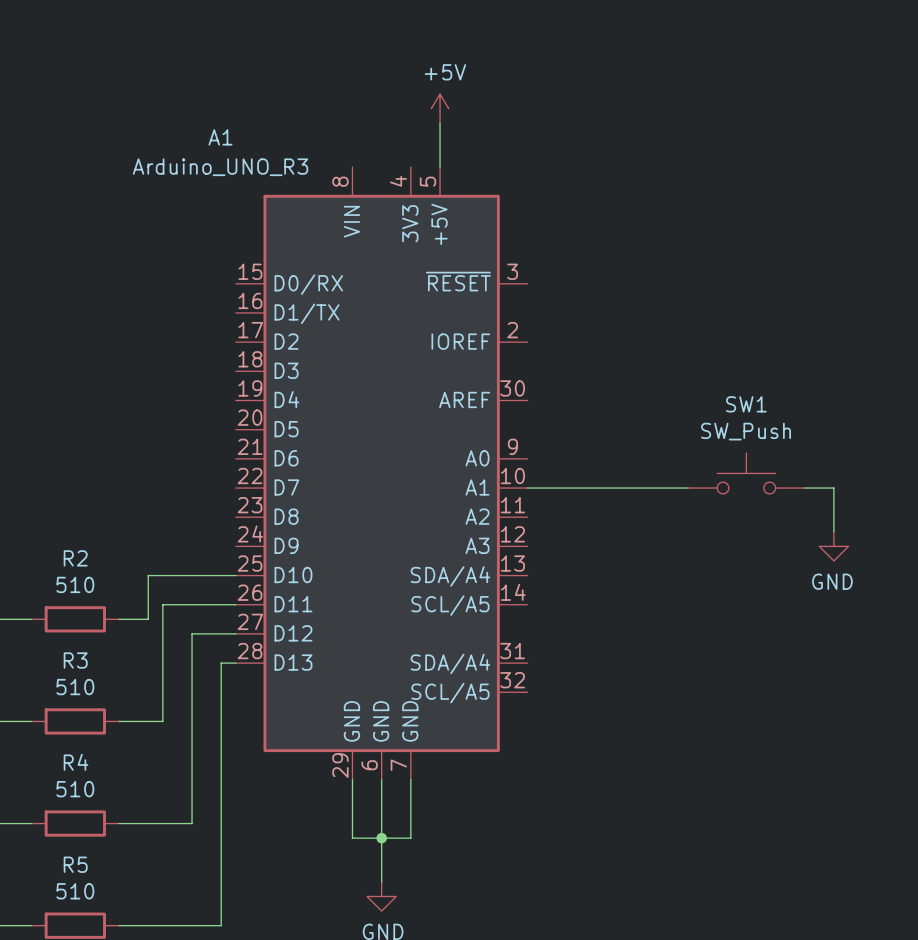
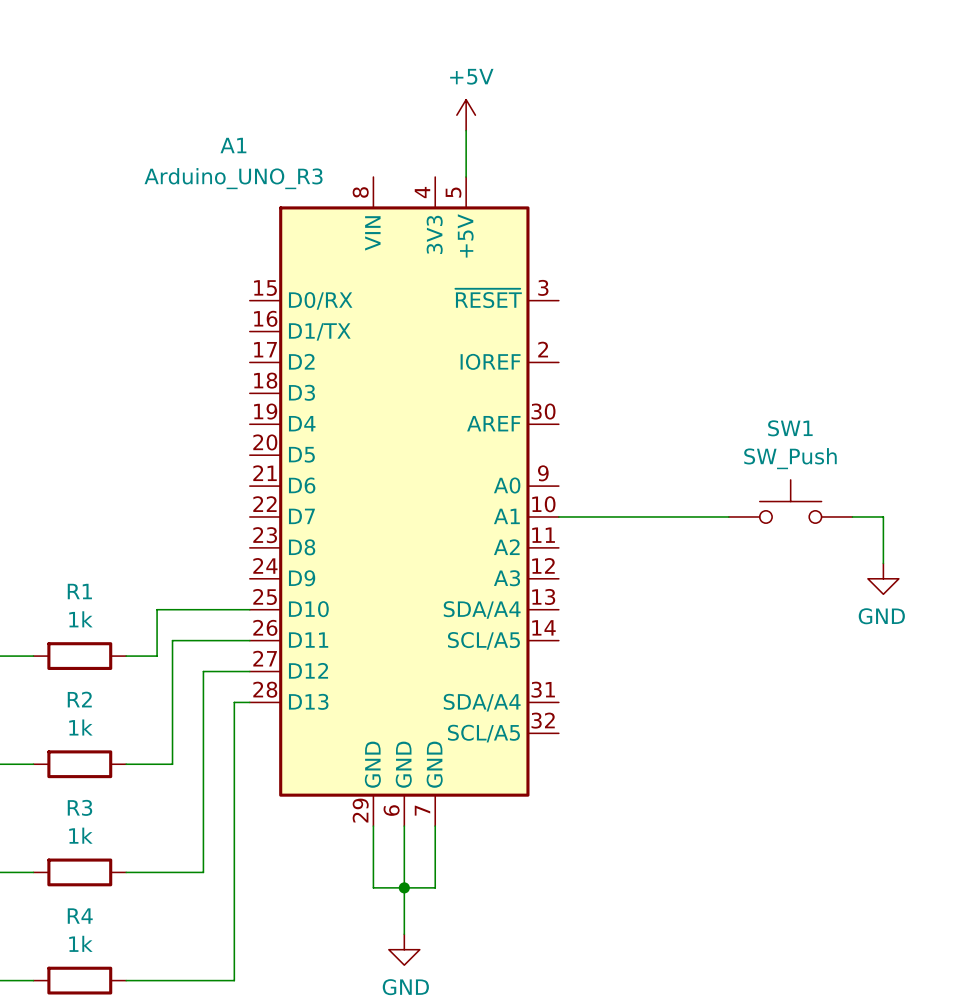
R2 name: R2 (75, 558) -> R1 (79, 591)
R2 value: 510 (75, 584) -> 1k (80, 619)
R3 name: R3 (75, 660) -> R2 (79, 699)
R3 value: 510 (75, 687) -> 1k (80, 727)
R4 name: R4 (76, 762) -> R3 (79, 807)
R4 value: 510 (75, 789) -> 1k (80, 835)
R5 name: R5 (75, 864) -> R4 (80, 916)
R5 value: 510 (75, 891) -> 1k (80, 943)

